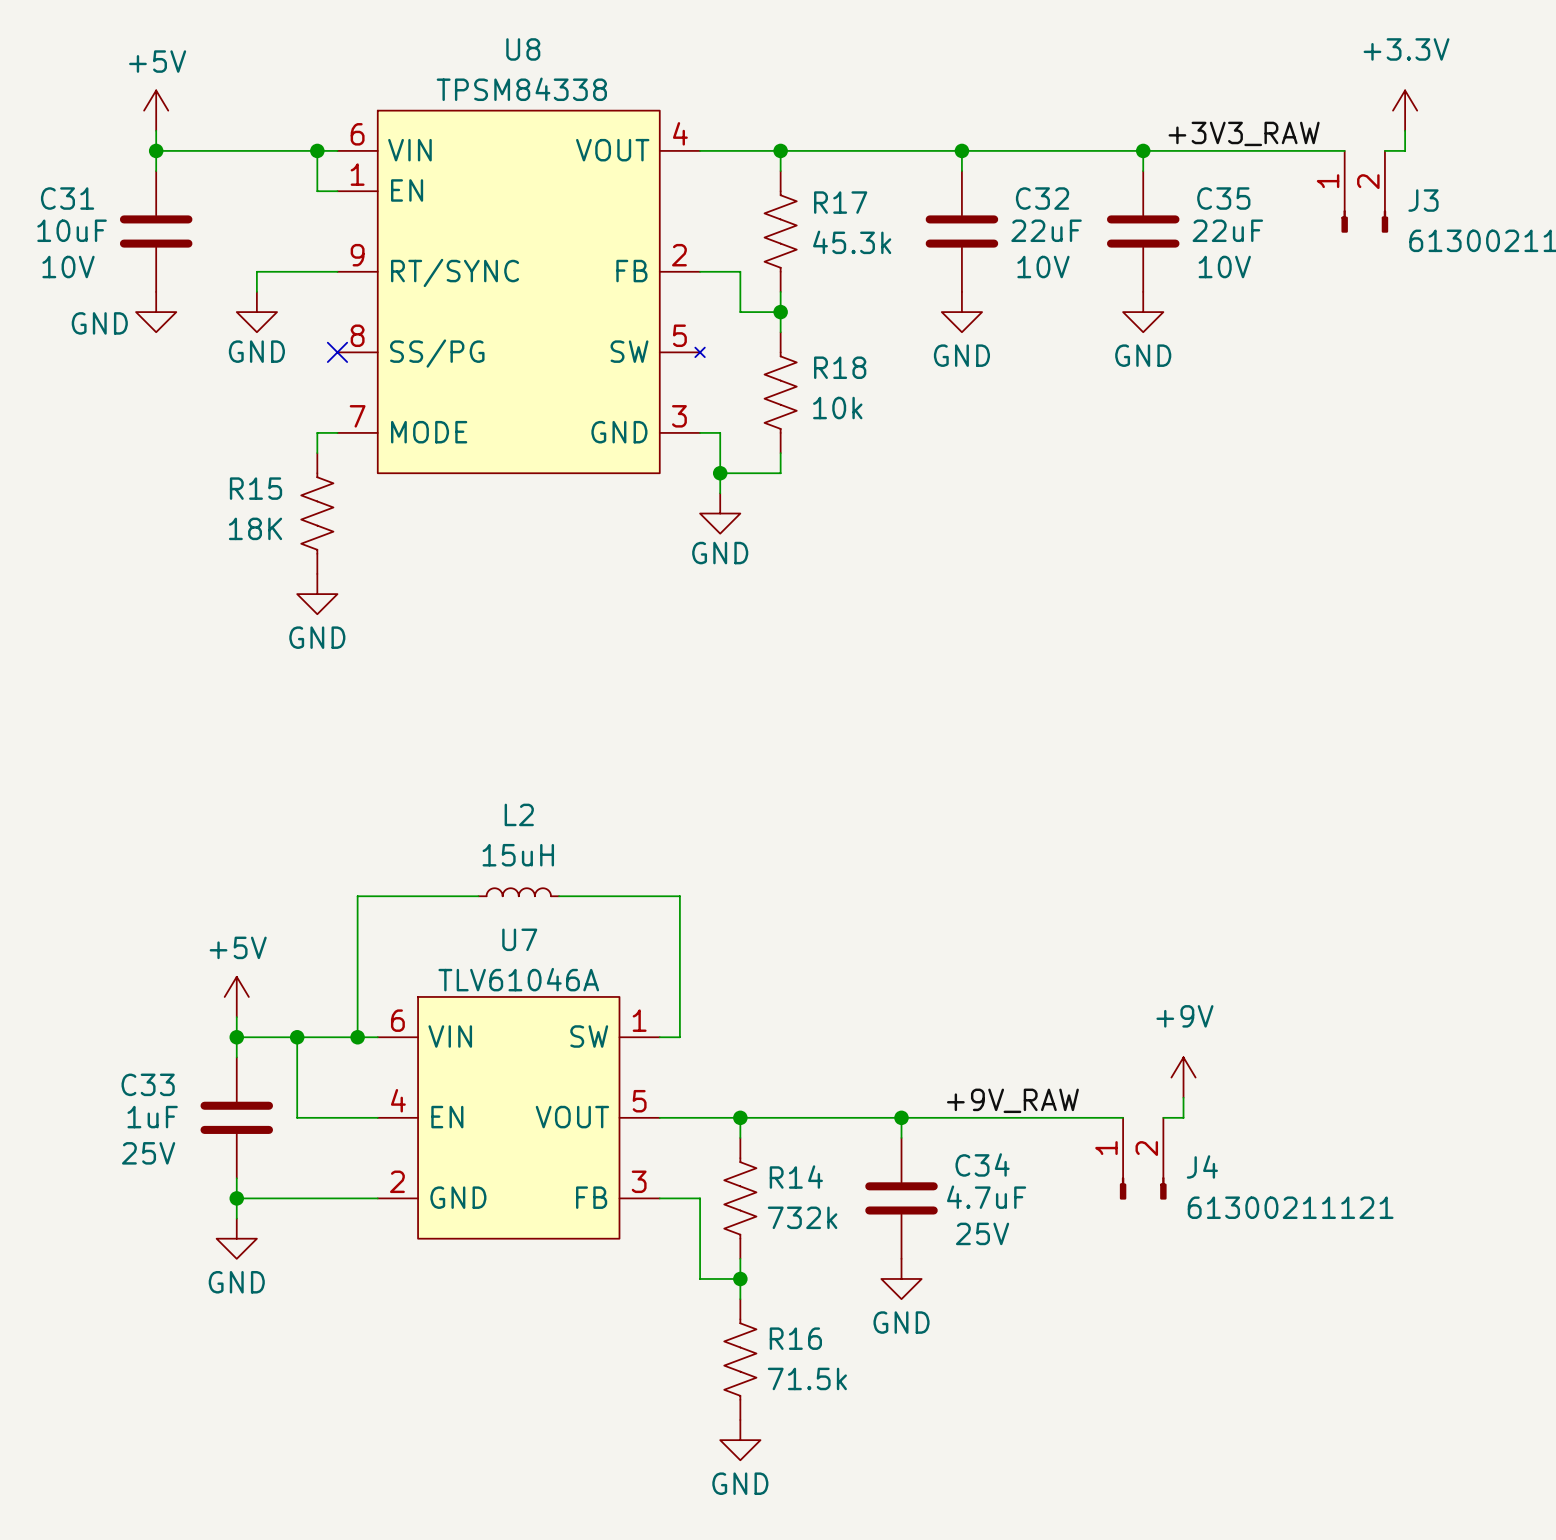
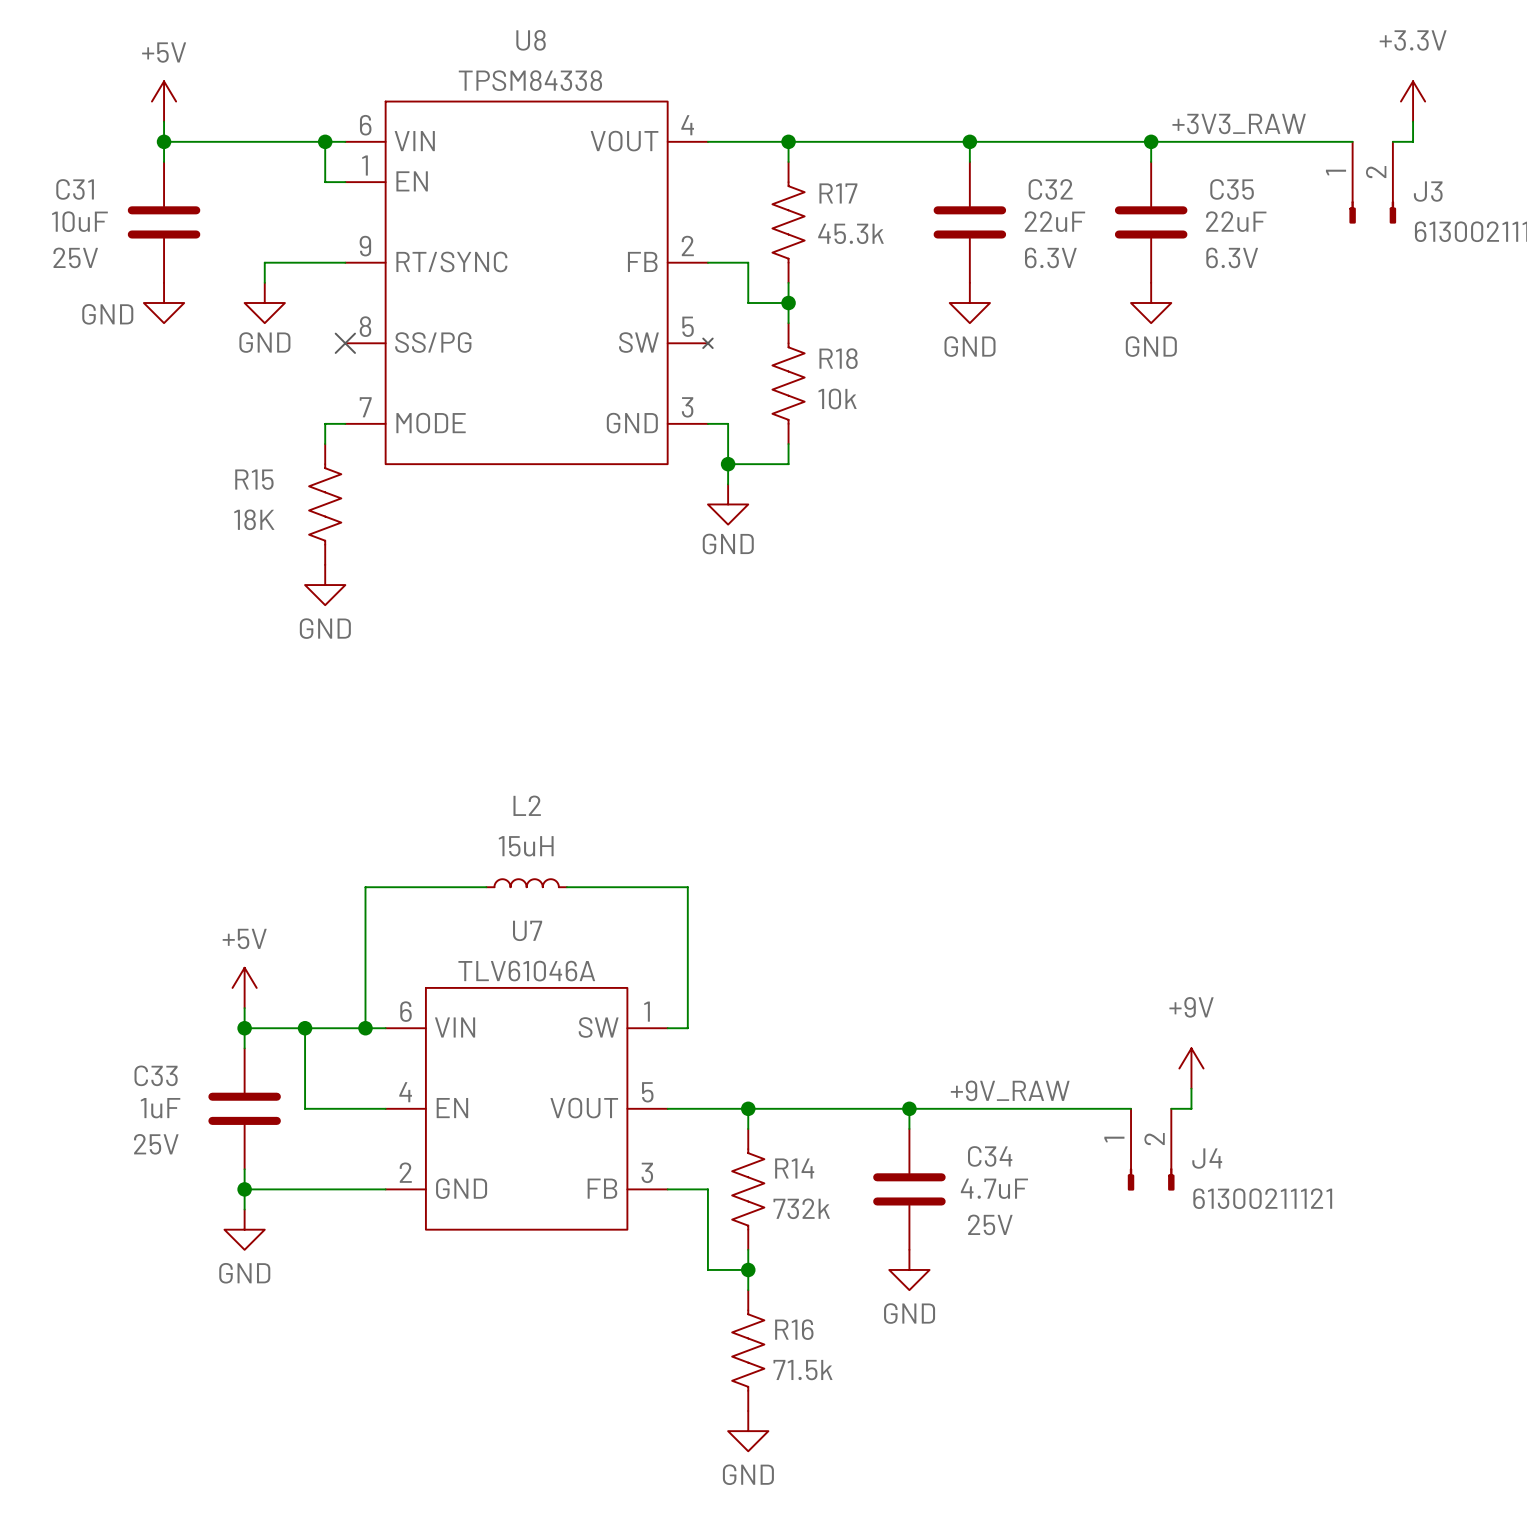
C31 text: 10V (68, 267) -> 25V (75, 257)
C32 text: 10V (1043, 267) -> 6.3V (1050, 257)
C35 text: 10V (1224, 267) -> 6.3V (1232, 257)

